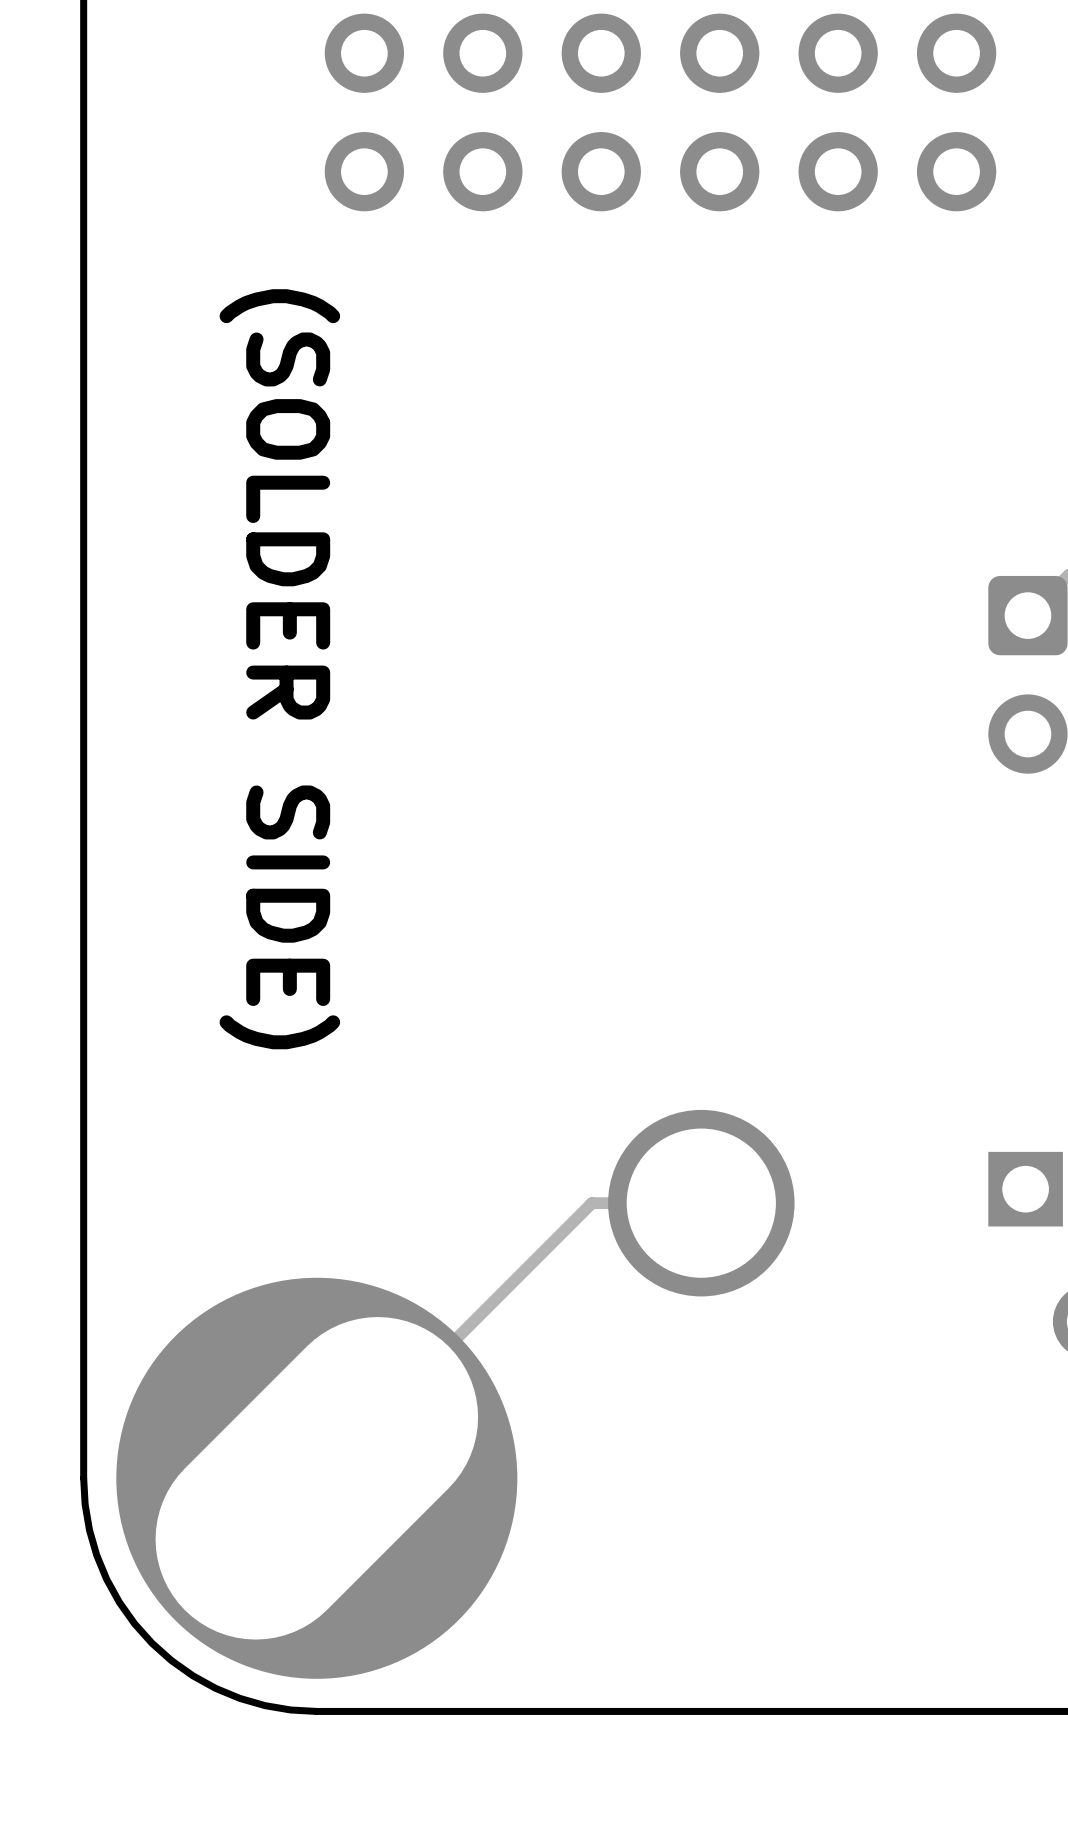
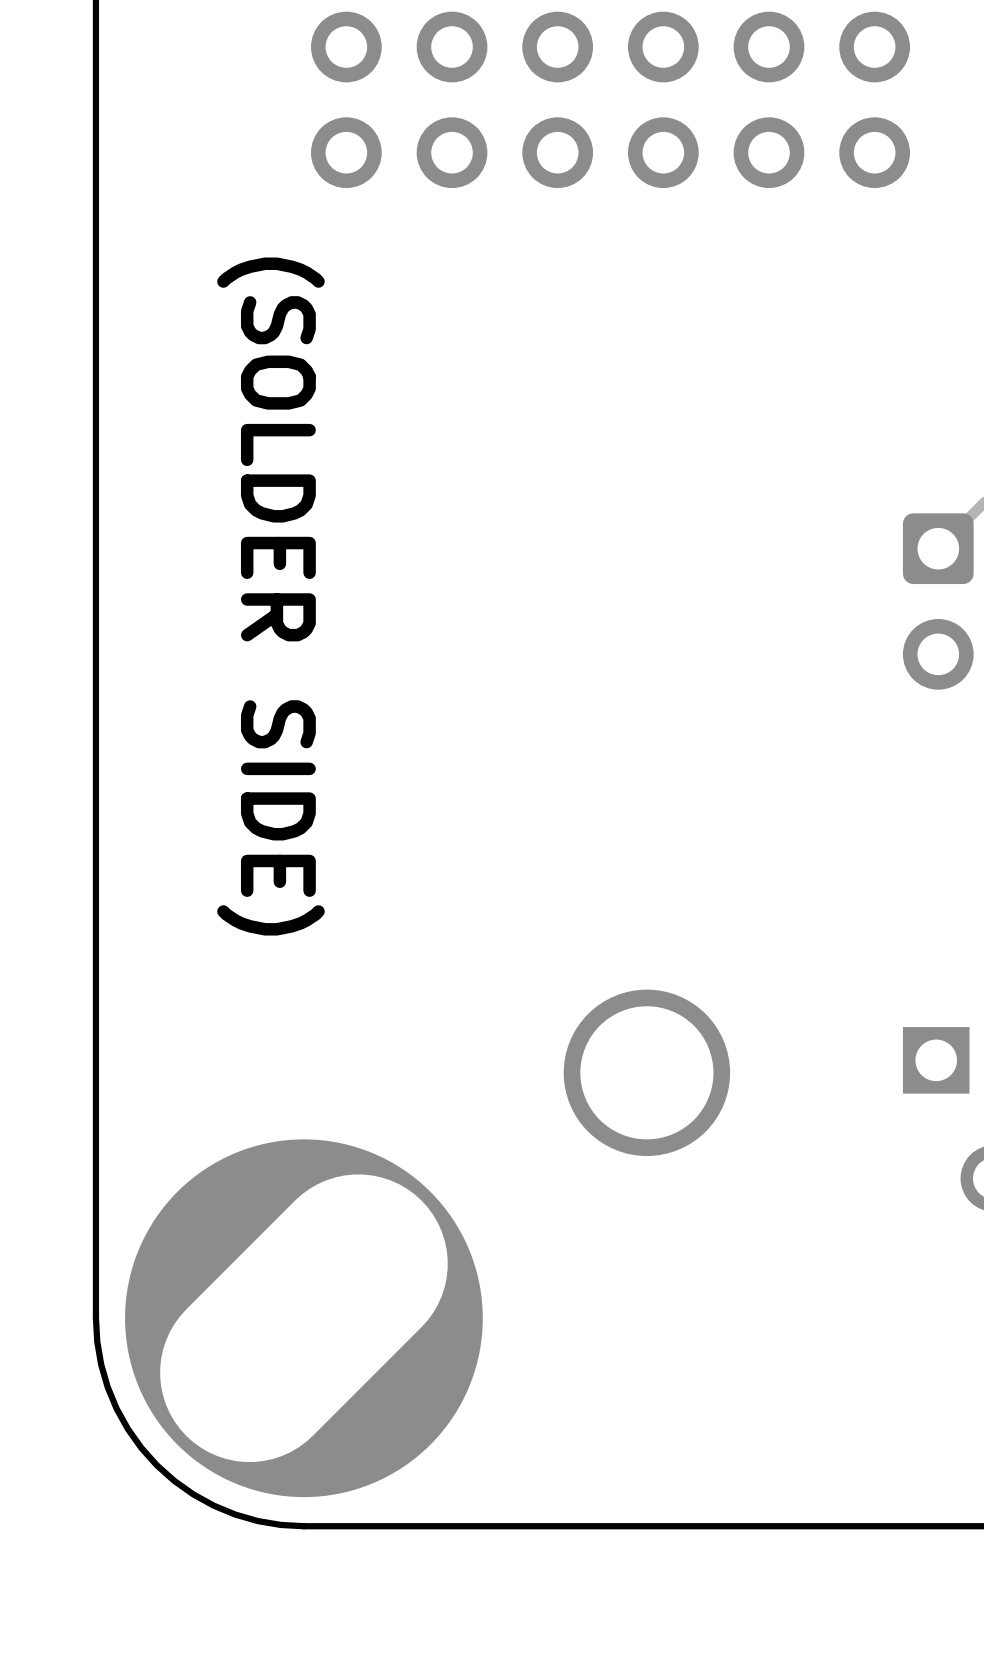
track: (701, 1203) (591, 1203) (316, 1478) -> none

